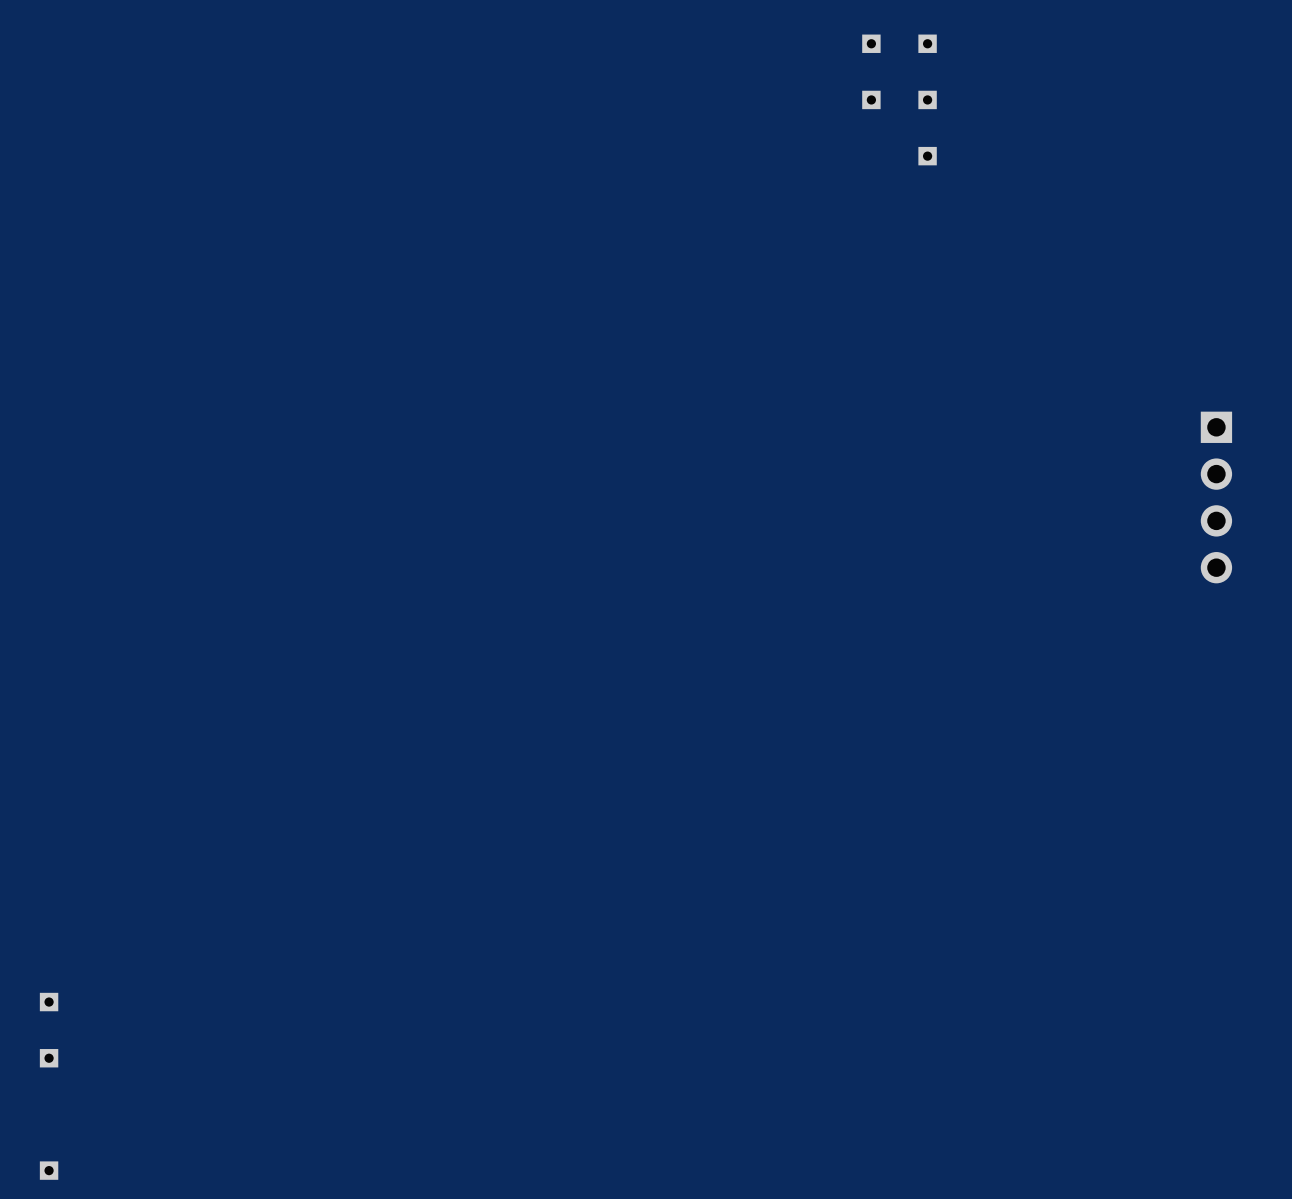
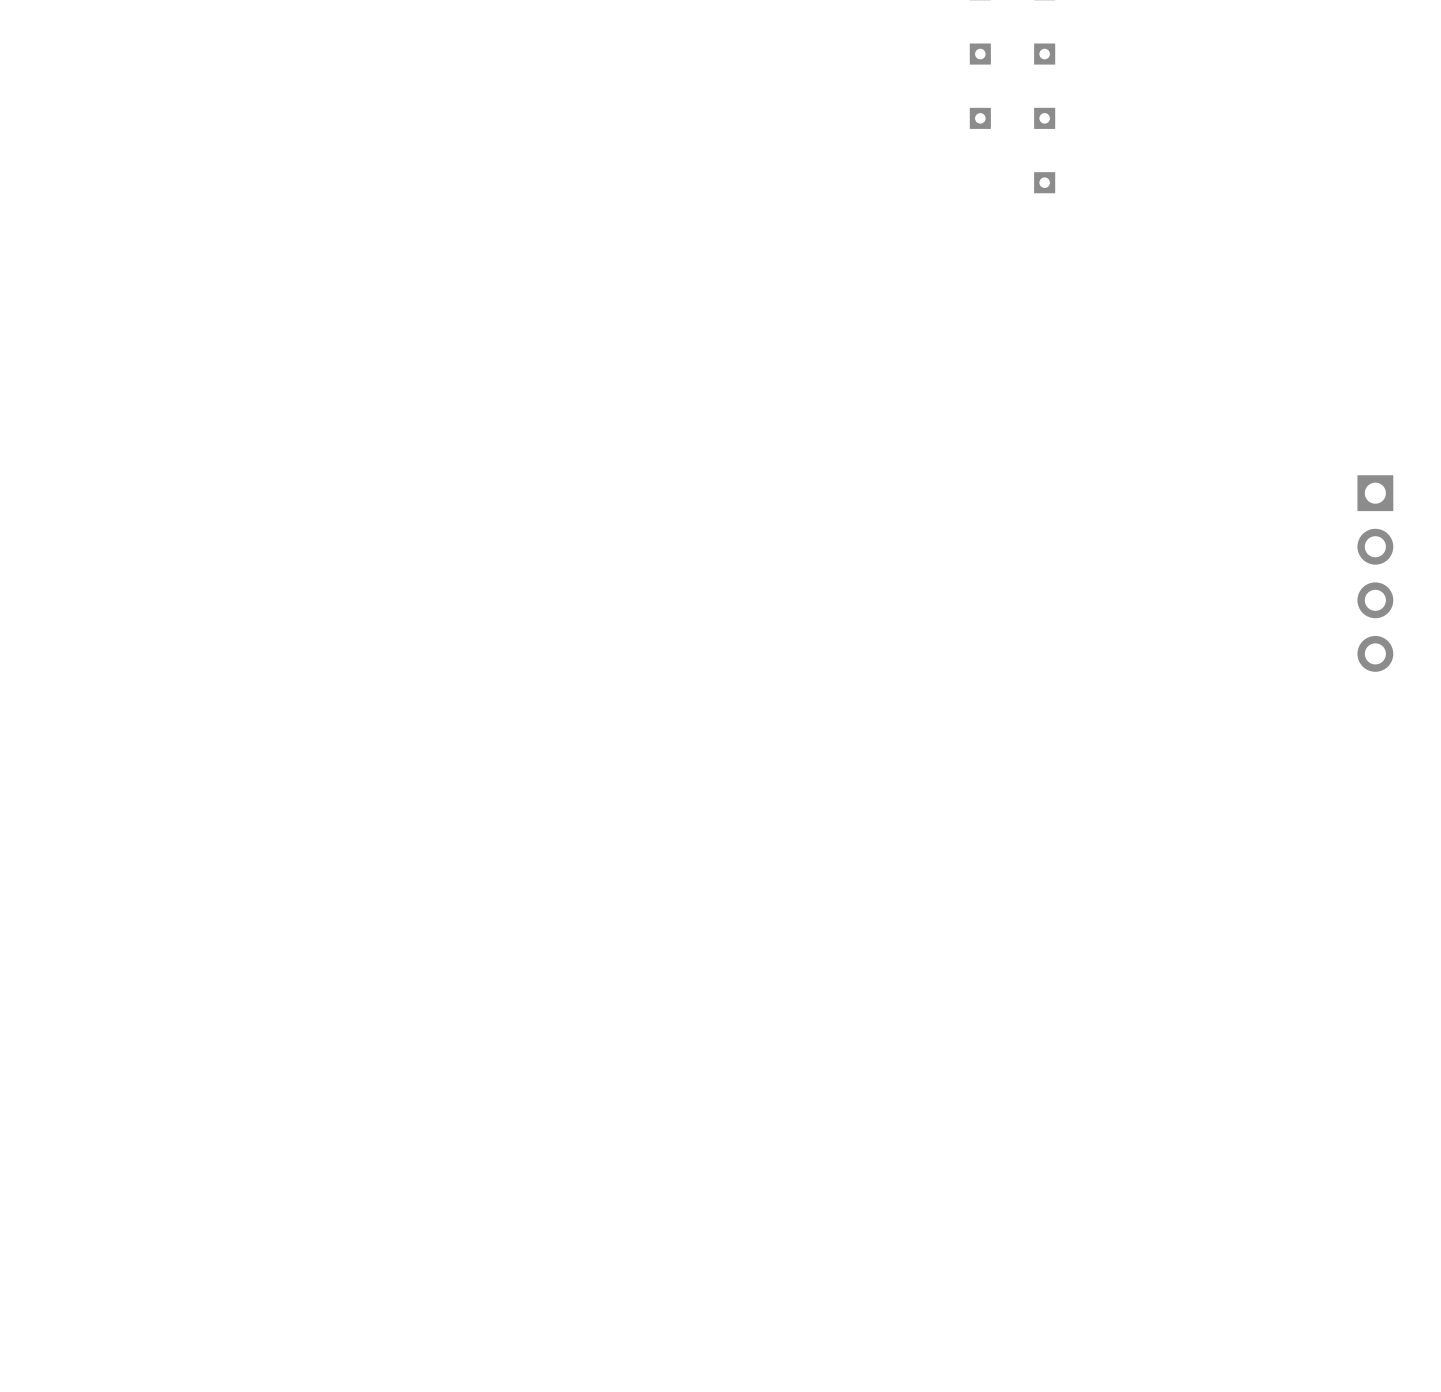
part: (49, 1002) -> none
part: (49, 1058) -> none
part: (49, 1170) -> none

